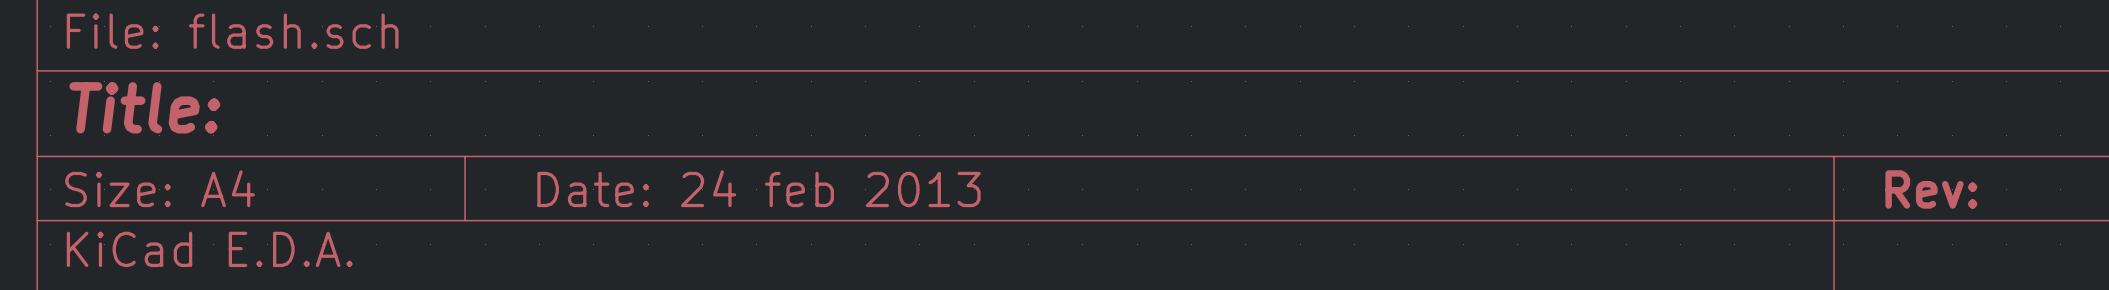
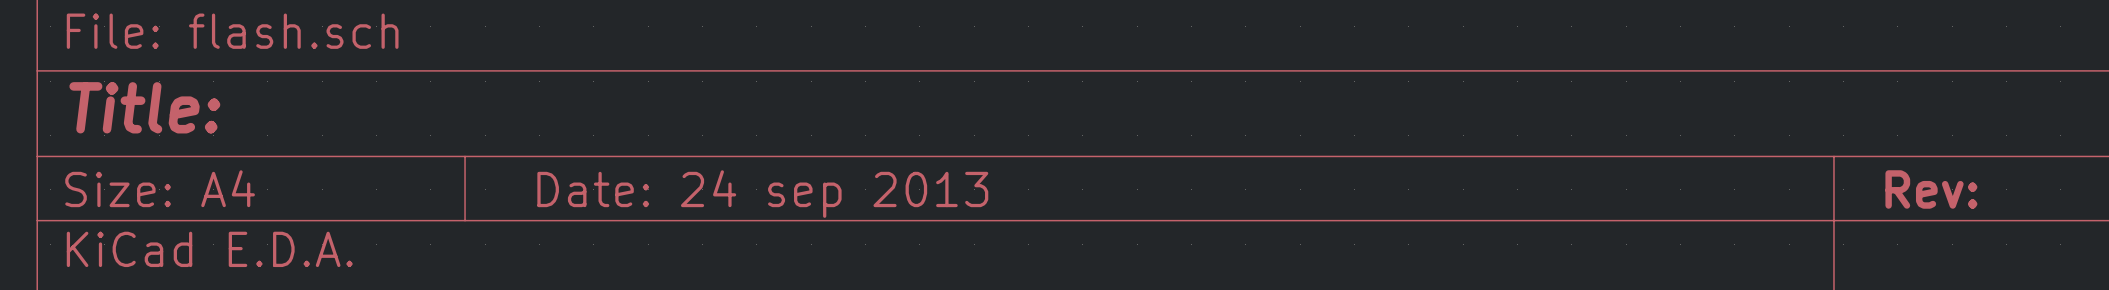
title block: Date: 24 feb 2013 (758, 188) -> Date: 24 sep 2013 (762, 194)

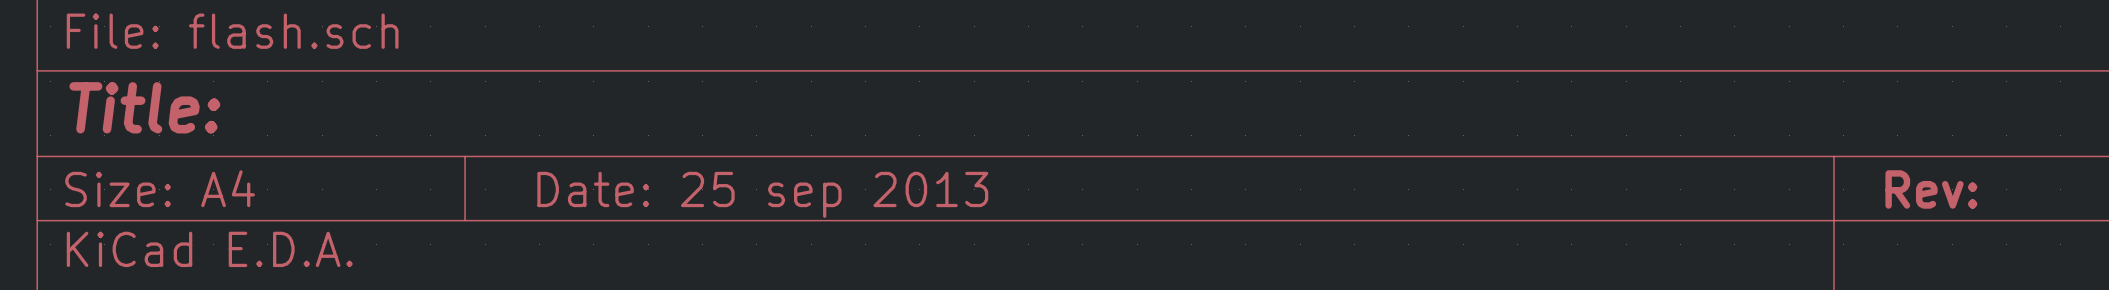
title block: Date: 24 sep 2013 (762, 194) -> Date: 25 sep 2013 (762, 194)

